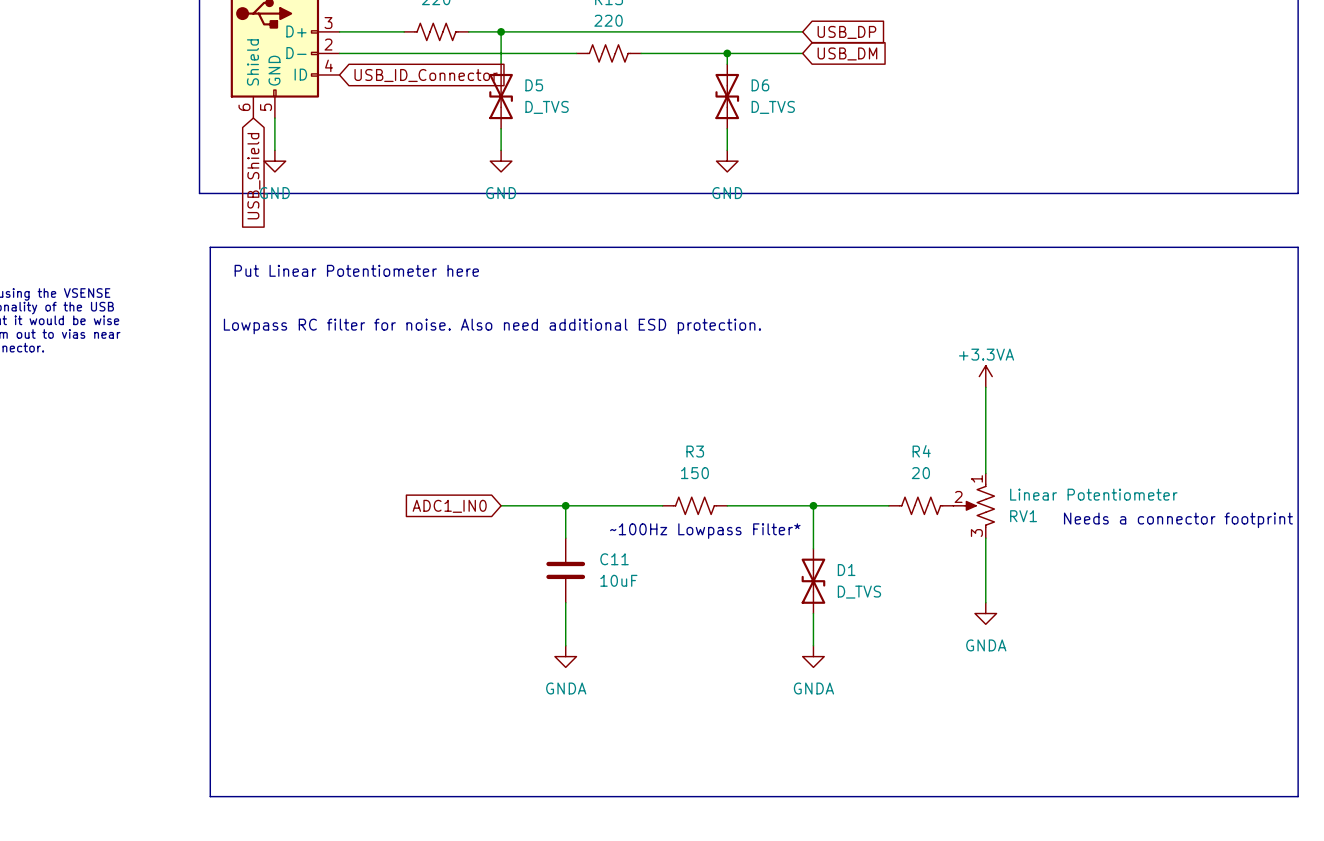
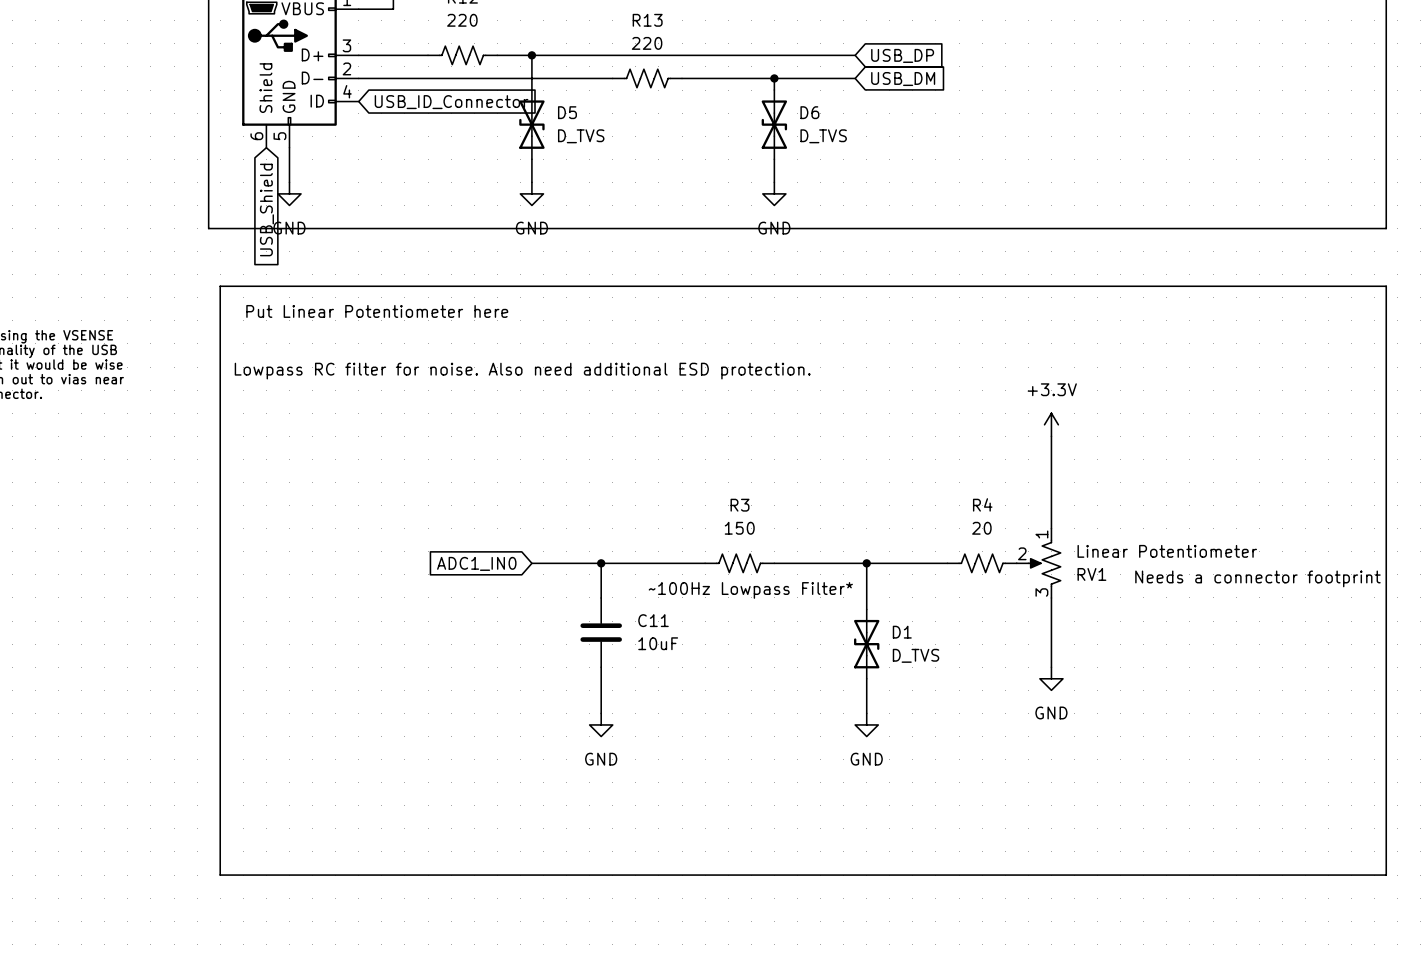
power symbol: +3.3VA (985, 376) -> +3.3V (1051, 424)
power symbol: GNDA (985, 613) -> GND (1051, 678)
power symbol: GNDA (565, 656) -> GND (601, 724)
power symbol: GNDA (813, 656) -> GND (866, 724)

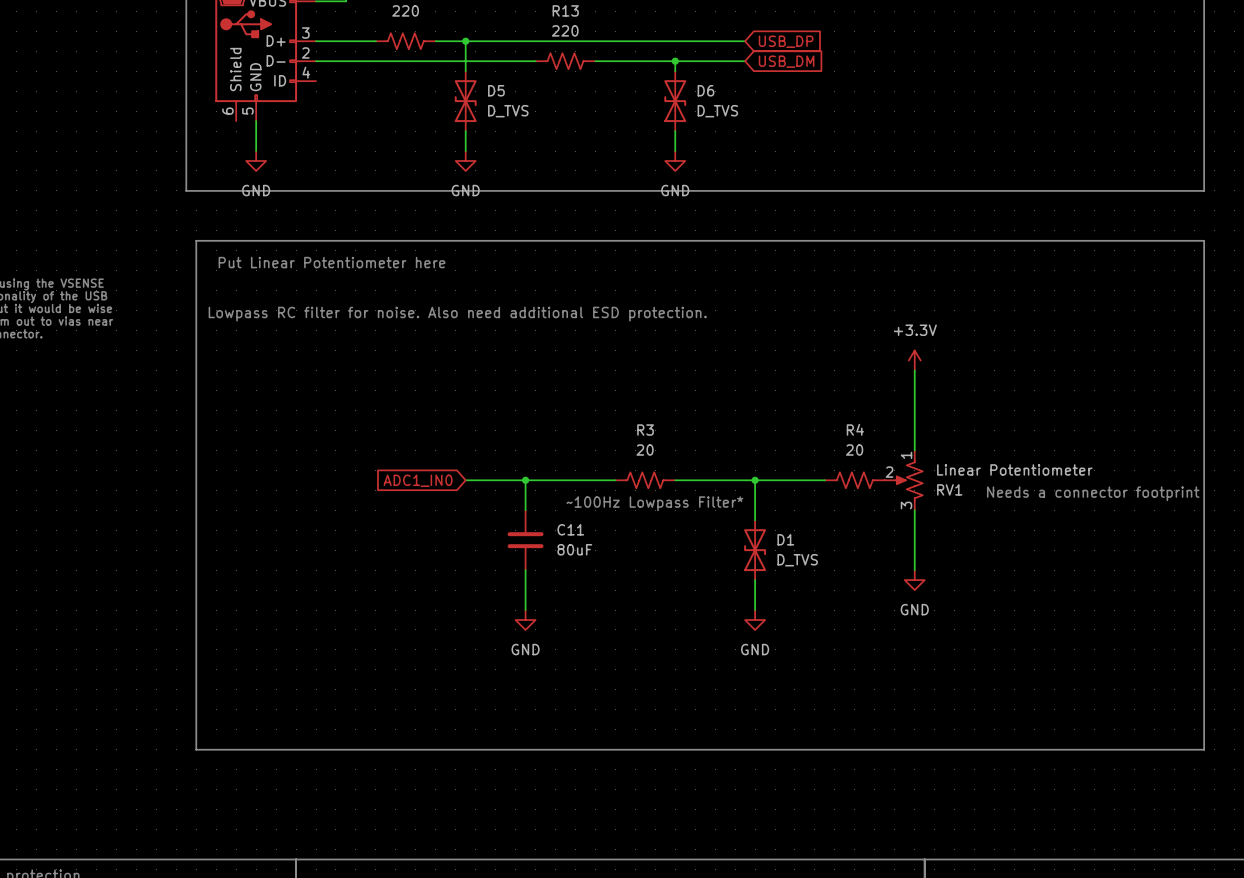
global label: USB_ID_Connector (451, 102) -> none
global label: USB_Shield (266, 210) -> none
R3 value: 150 (739, 528) -> 20 (645, 449)
C11 value: 10uF (658, 643) -> 80uF (574, 549)

